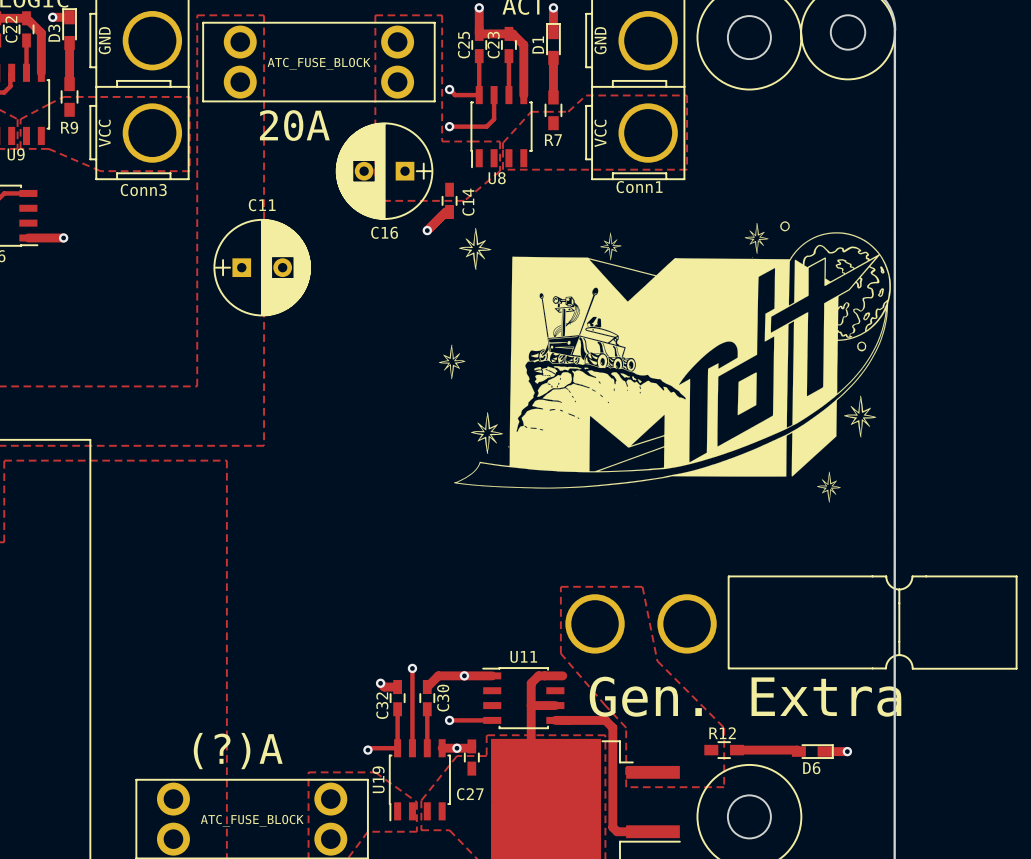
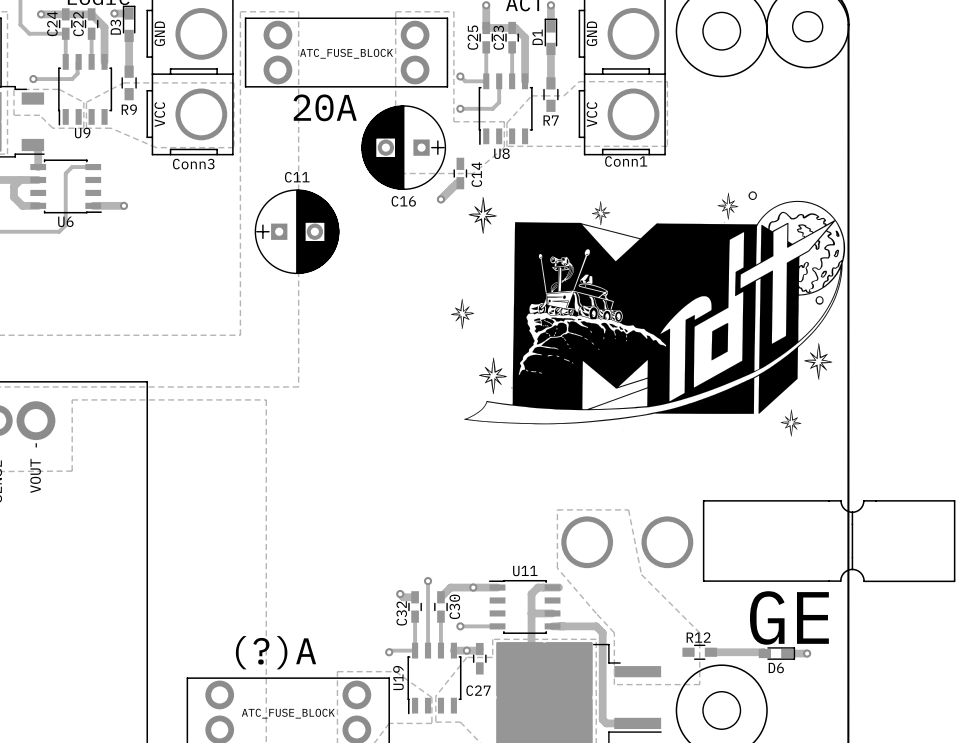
text: Gen. Extra (745, 696) -> none
text: none -> GE (789, 617)

